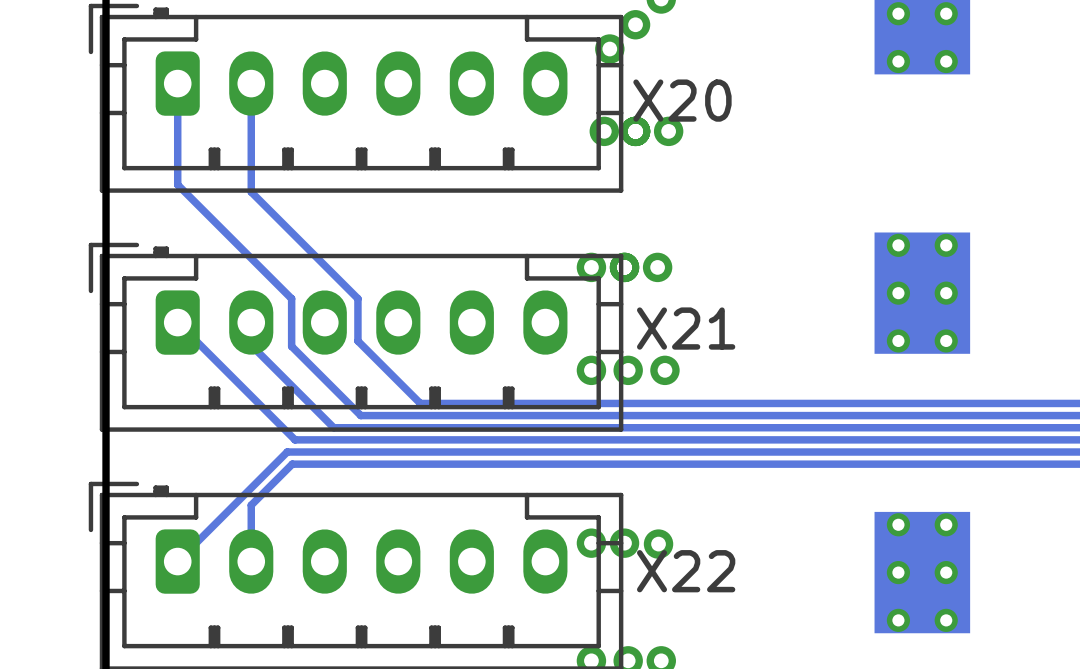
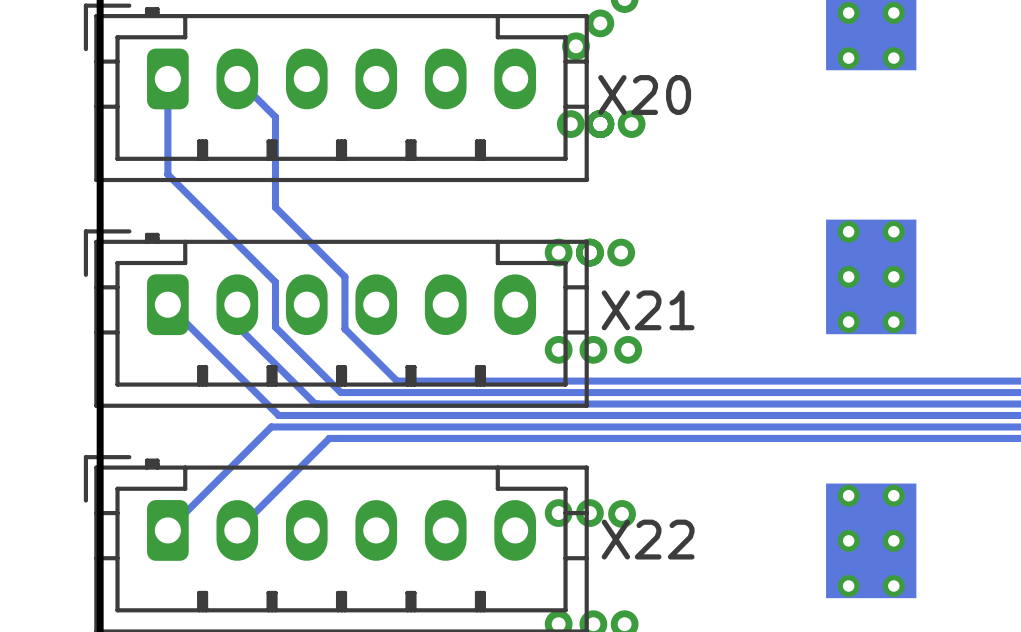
track: (251, 83) (251, 192) (357, 298) (357, 341) (365, 348) -> (237, 78) (275, 117) (275, 207) (344, 276) (344, 329)
track: (348, 464) (292, 464) (251, 505) (251, 561) -> (329, 438) (237, 530)

